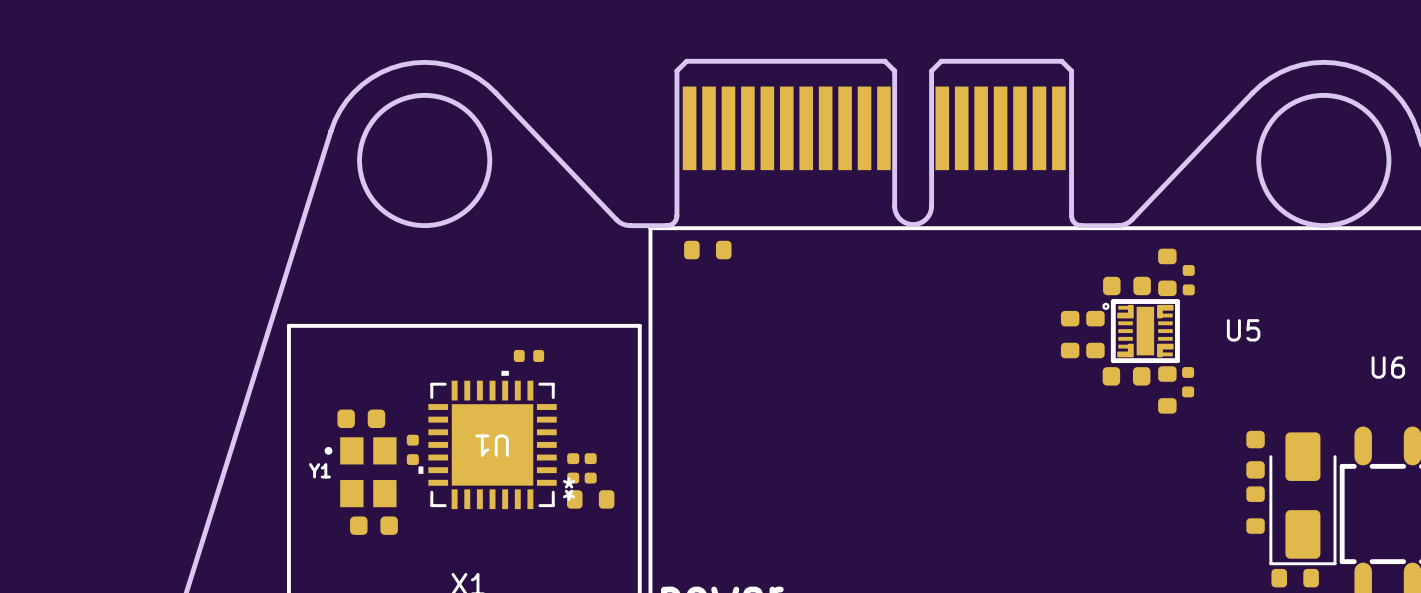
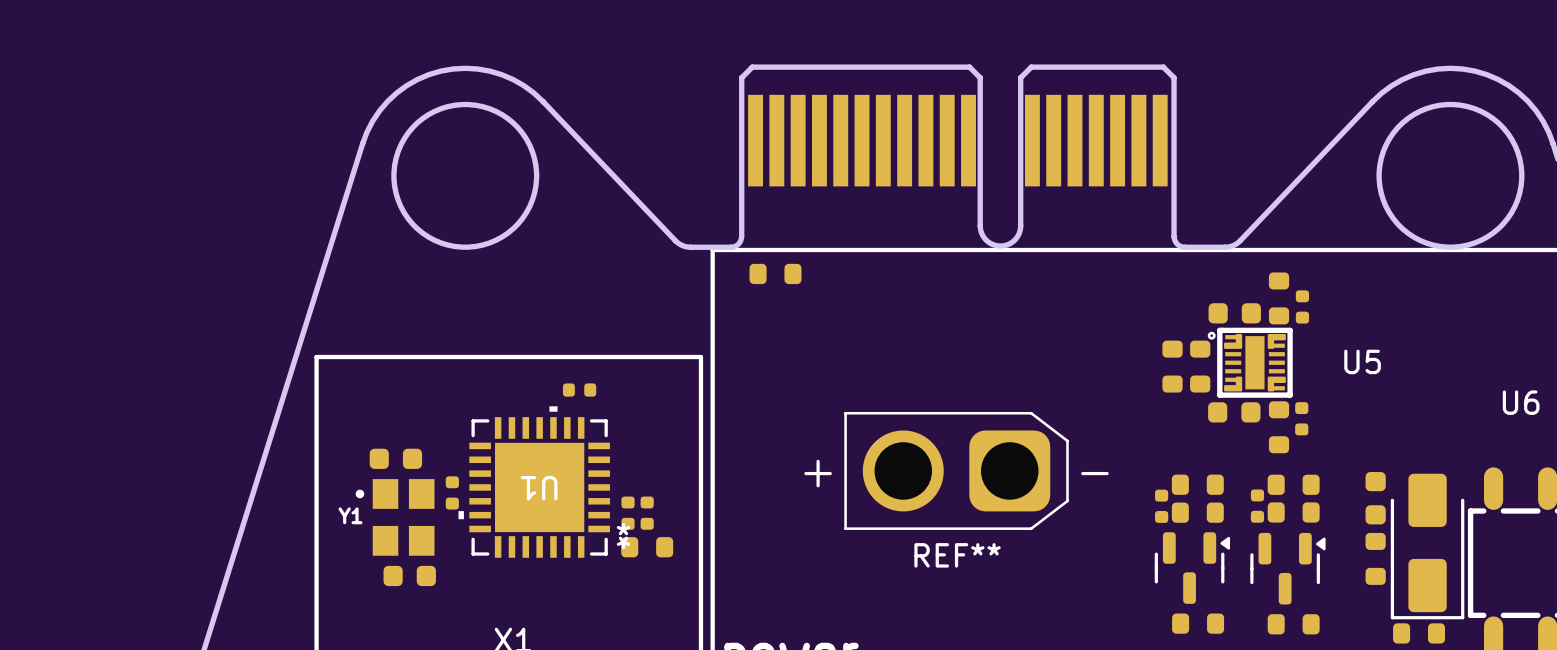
REF**: none -> (956, 470)
part: none -> (1197, 484)
part: none -> (1293, 484)
part: none -> (1257, 506)
part: none -> (1161, 506)
part: none -> (1197, 512)
part: none -> (1293, 512)
part: none -> (1192, 568)
part: none -> (1287, 568)
part: none -> (1198, 623)
part: none -> (1293, 624)

